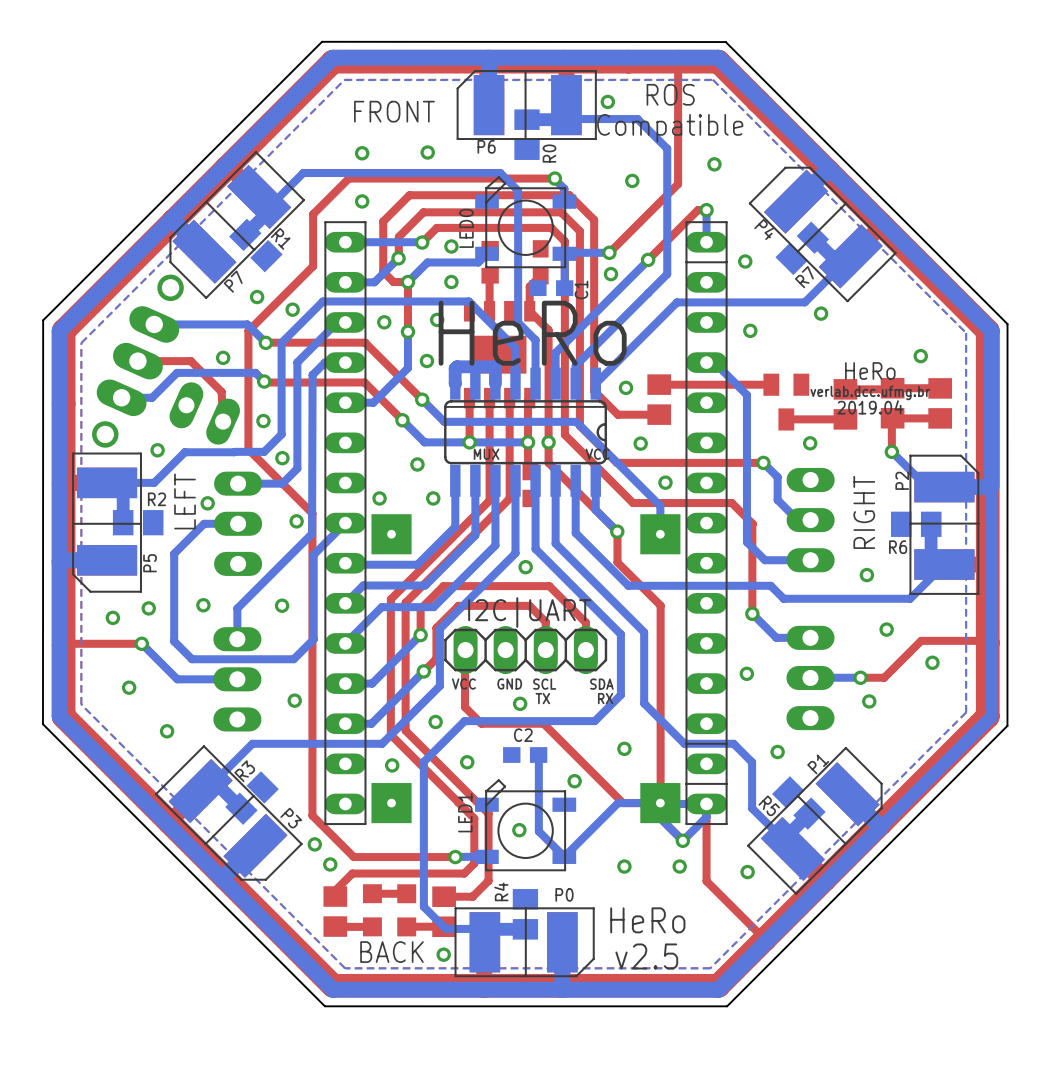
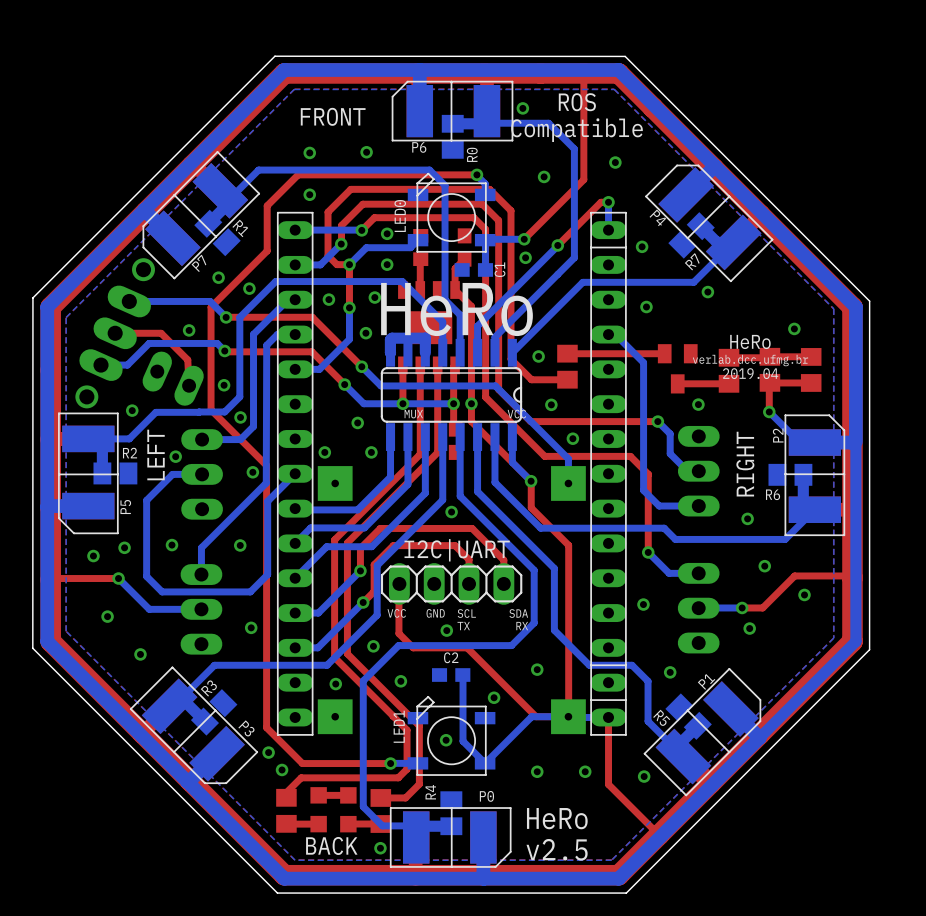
bottom track: (660, 803) (660, 818) (682, 840) (706, 817) (706, 803) -> none
via: (682, 840) -> none

